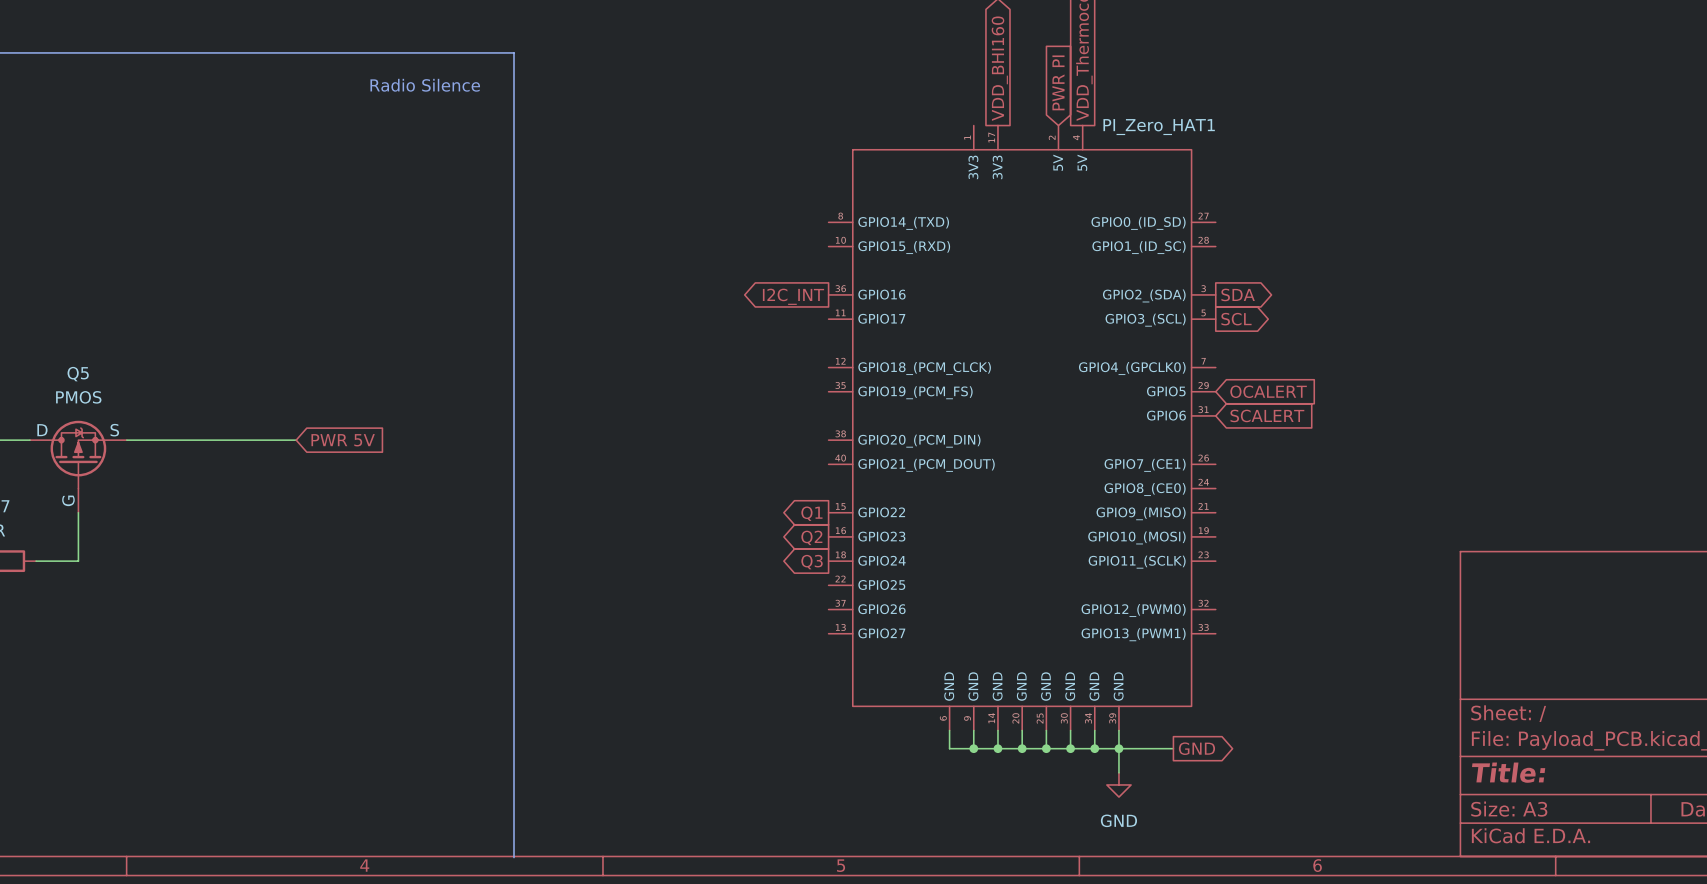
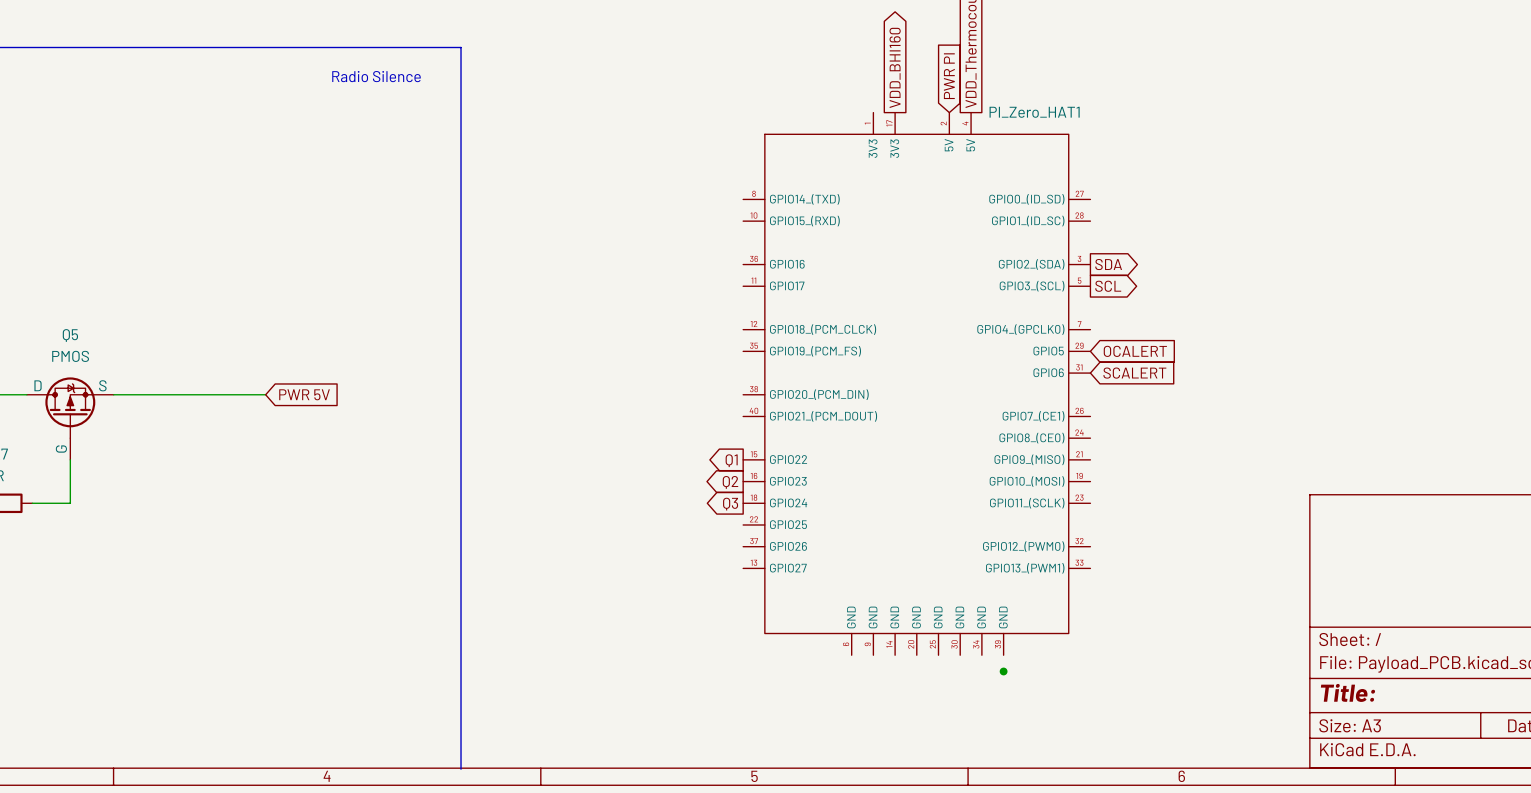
global label: I2C_INT (793, 296) -> none
wire: (949, 730) (949, 748) (1173, 748) -> none
wire: (973, 730) (973, 748) -> none
wire: (997, 730) (997, 748) -> none
wire: (1022, 730) (1022, 748) -> none
wire: (1046, 730) (1046, 748) -> none
wire: (1070, 730) (1070, 748) -> none
wire: (1094, 730) (1094, 748) -> none
wire: (1118, 730) (1118, 772) -> none
junction: (973, 748) -> none
junction: (997, 748) -> none
junction: (1022, 748) -> none
junction: (1046, 748) -> none
junction: (1070, 748) -> none
junction: (1094, 748) -> none
global label: GND (1196, 748) -> none
power symbol: GND (1118, 784) -> none

